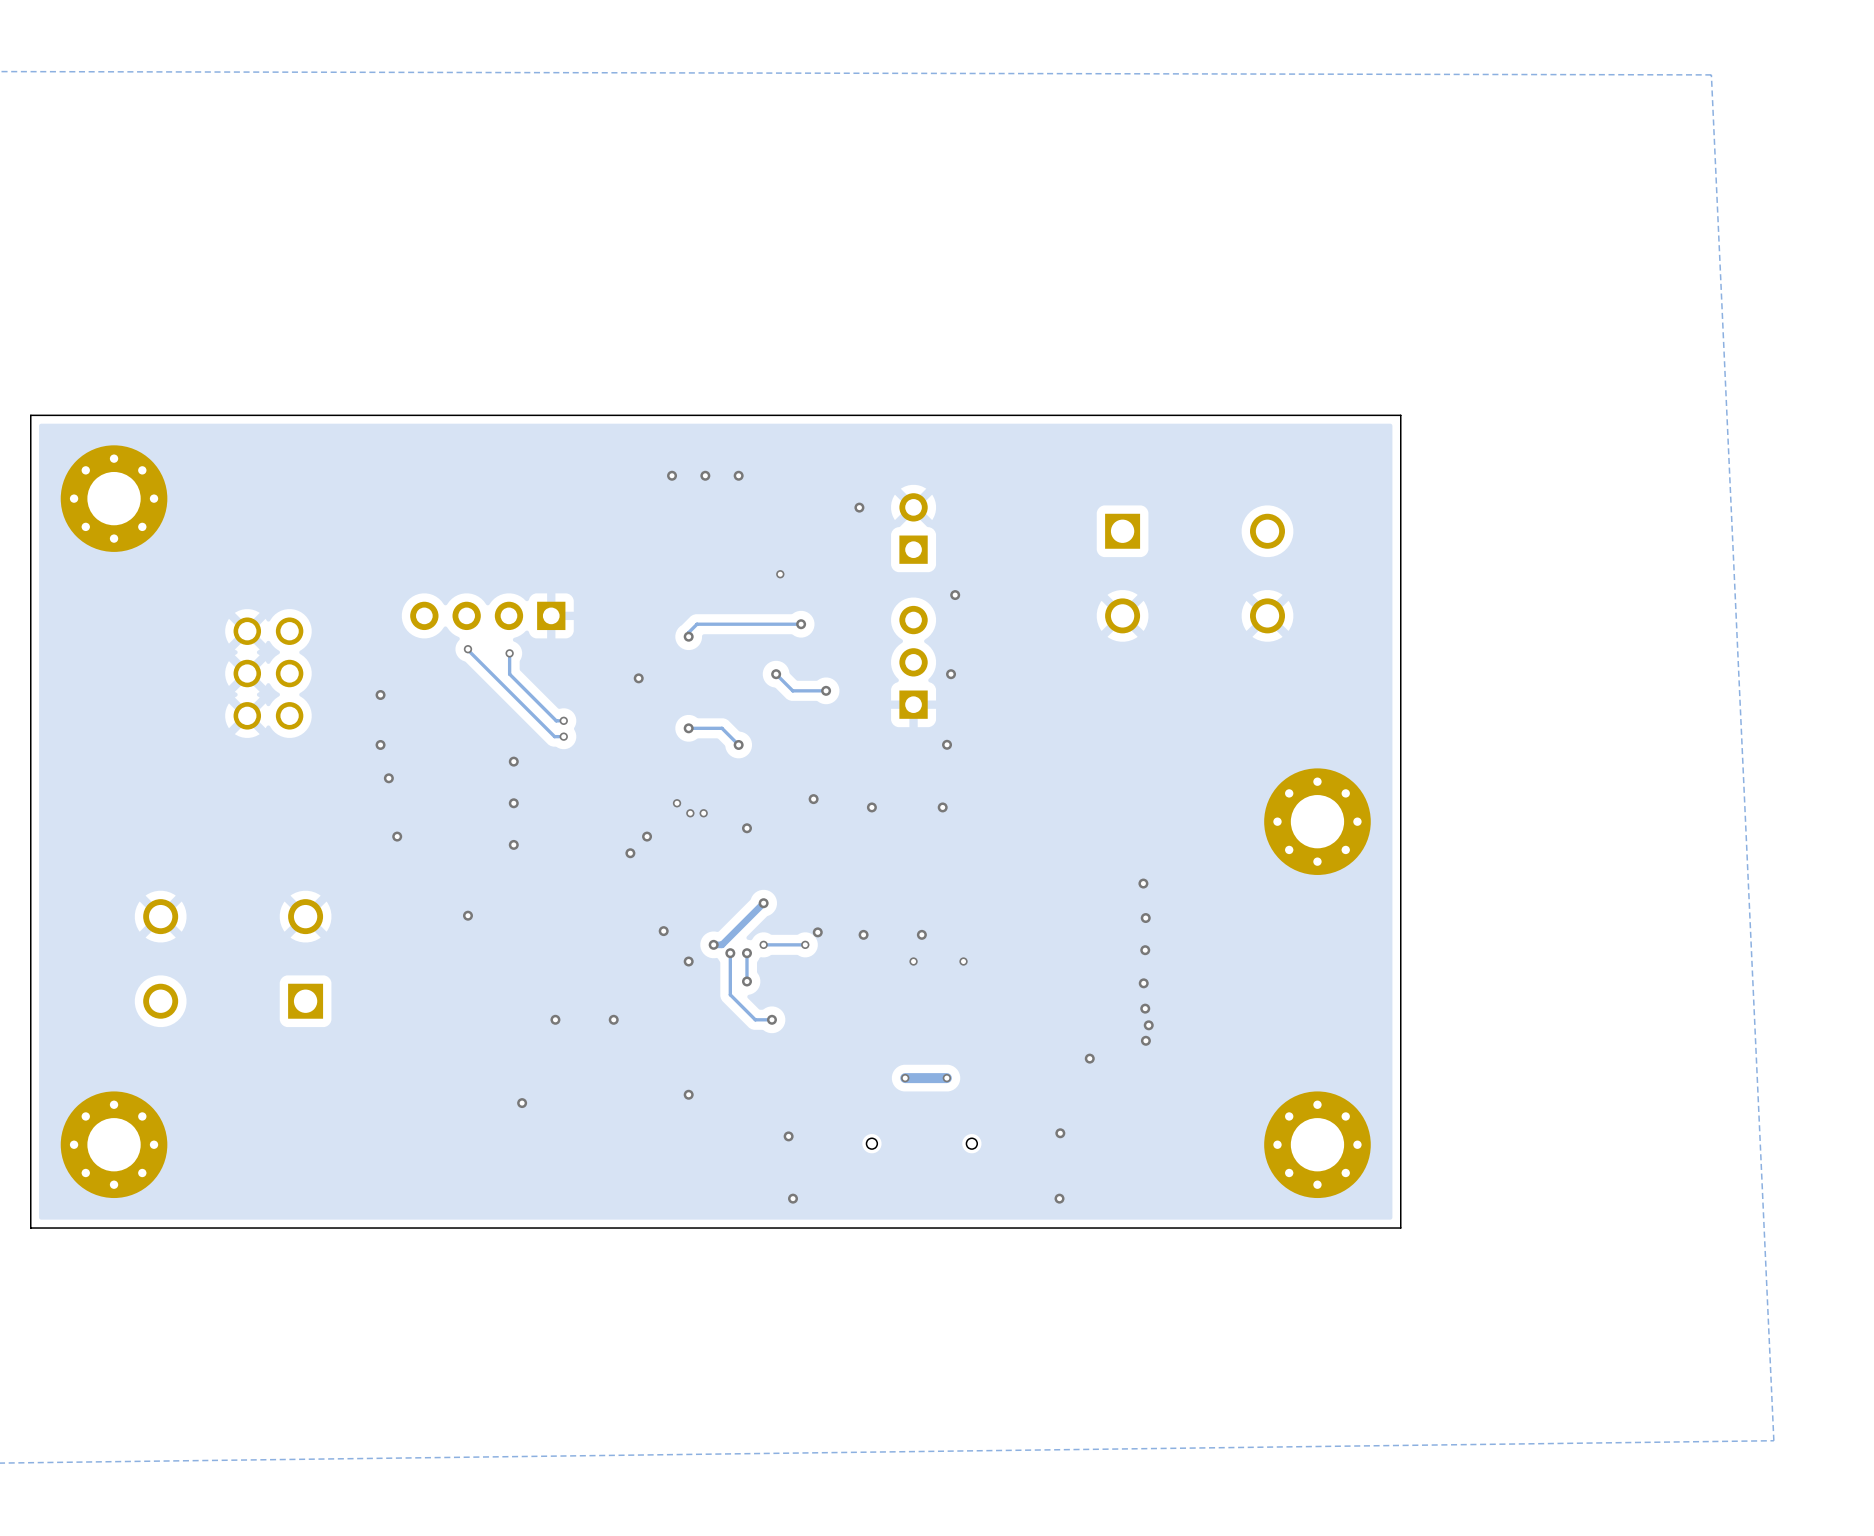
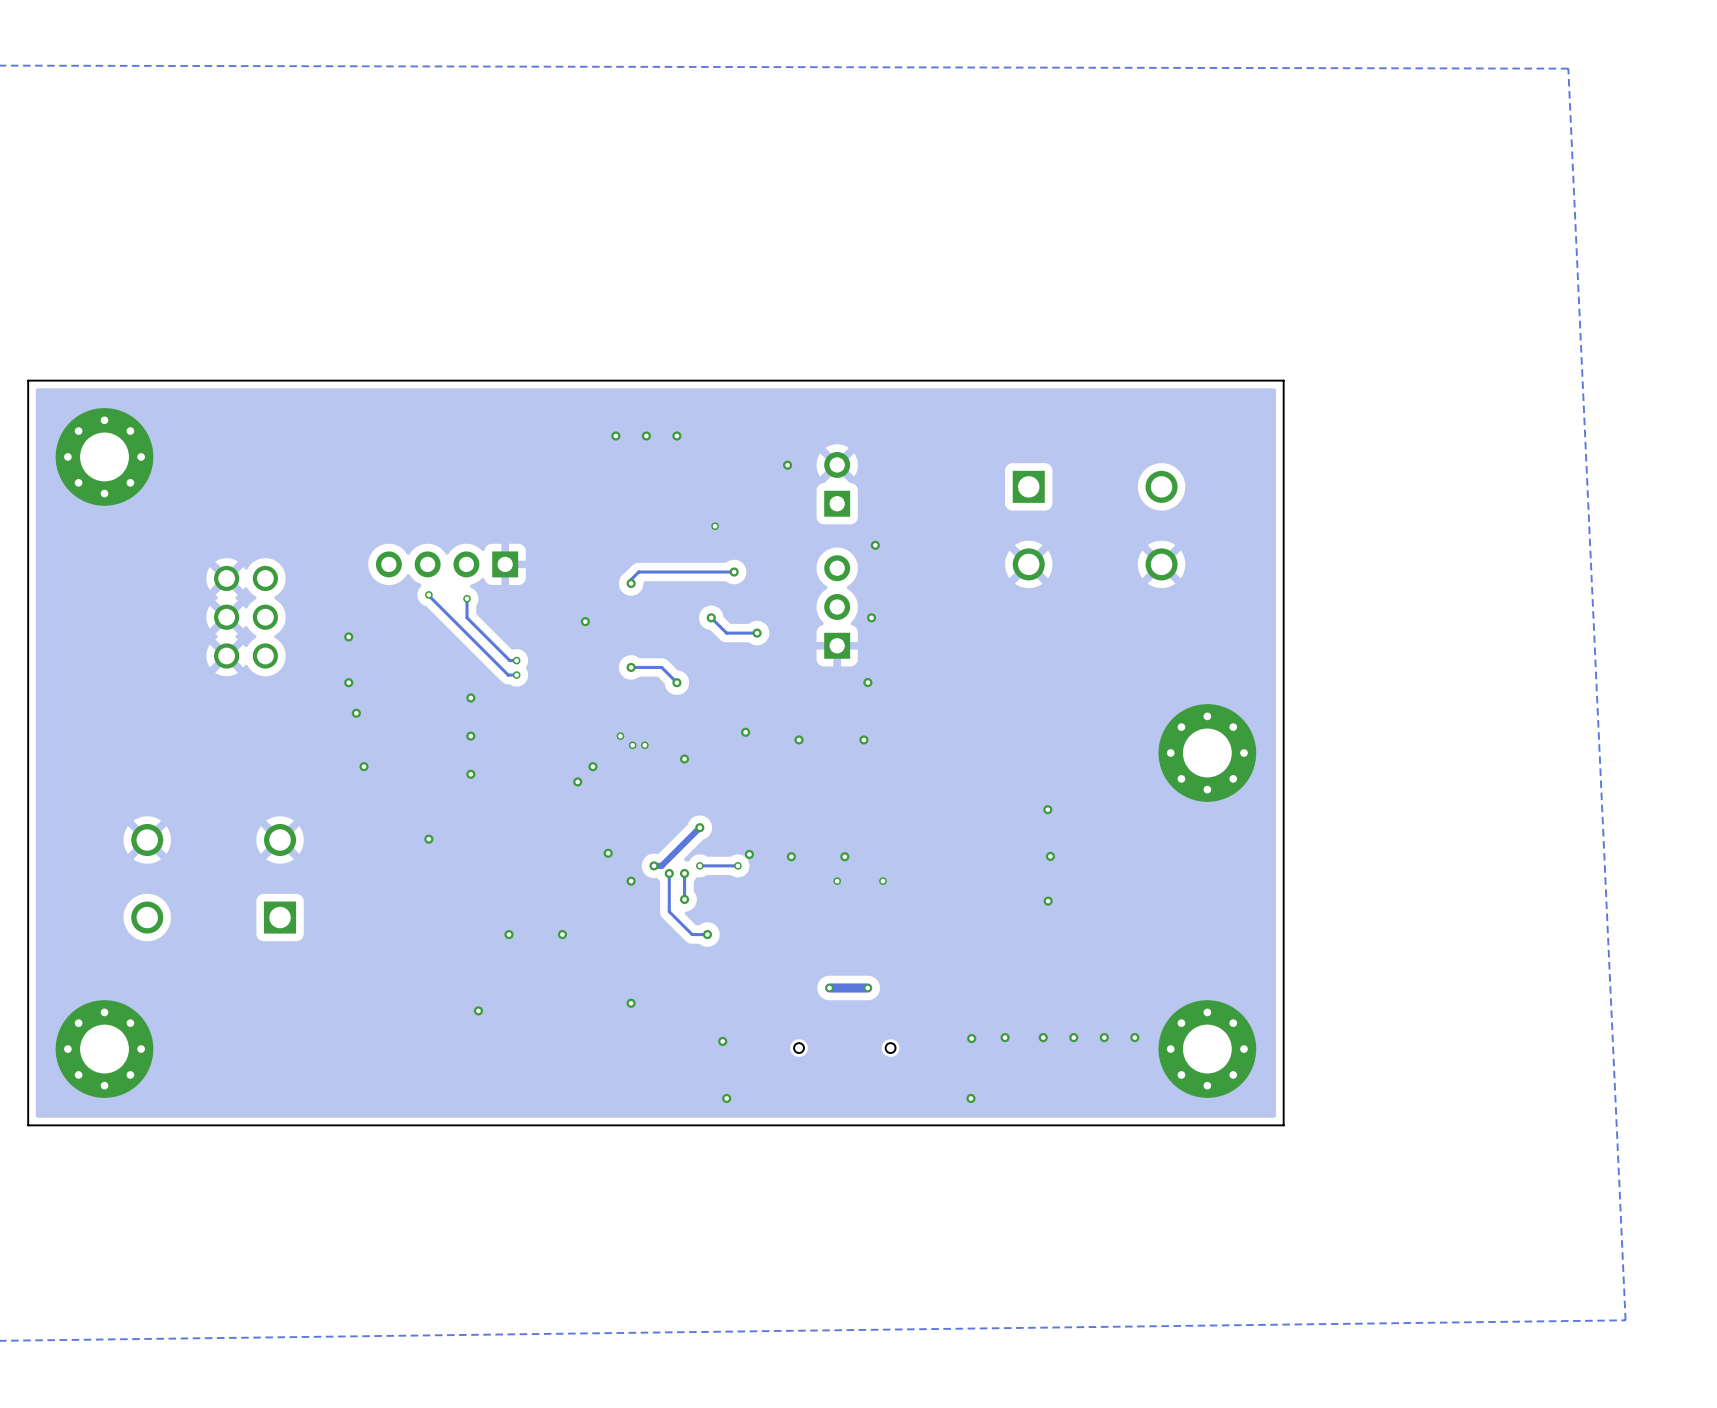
via: (1145, 918) -> none
via: none -> (1050, 856)
via: (1145, 950) -> none
via: (1145, 1008) -> none
via: (1148, 1025) -> none
via: (1145, 1040) -> none
via: (1089, 1058) -> none
via: none -> (1005, 1037)
via: none -> (1043, 1037)
via: none -> (1073, 1037)
via: none -> (1104, 1037)
via: none -> (1134, 1037)

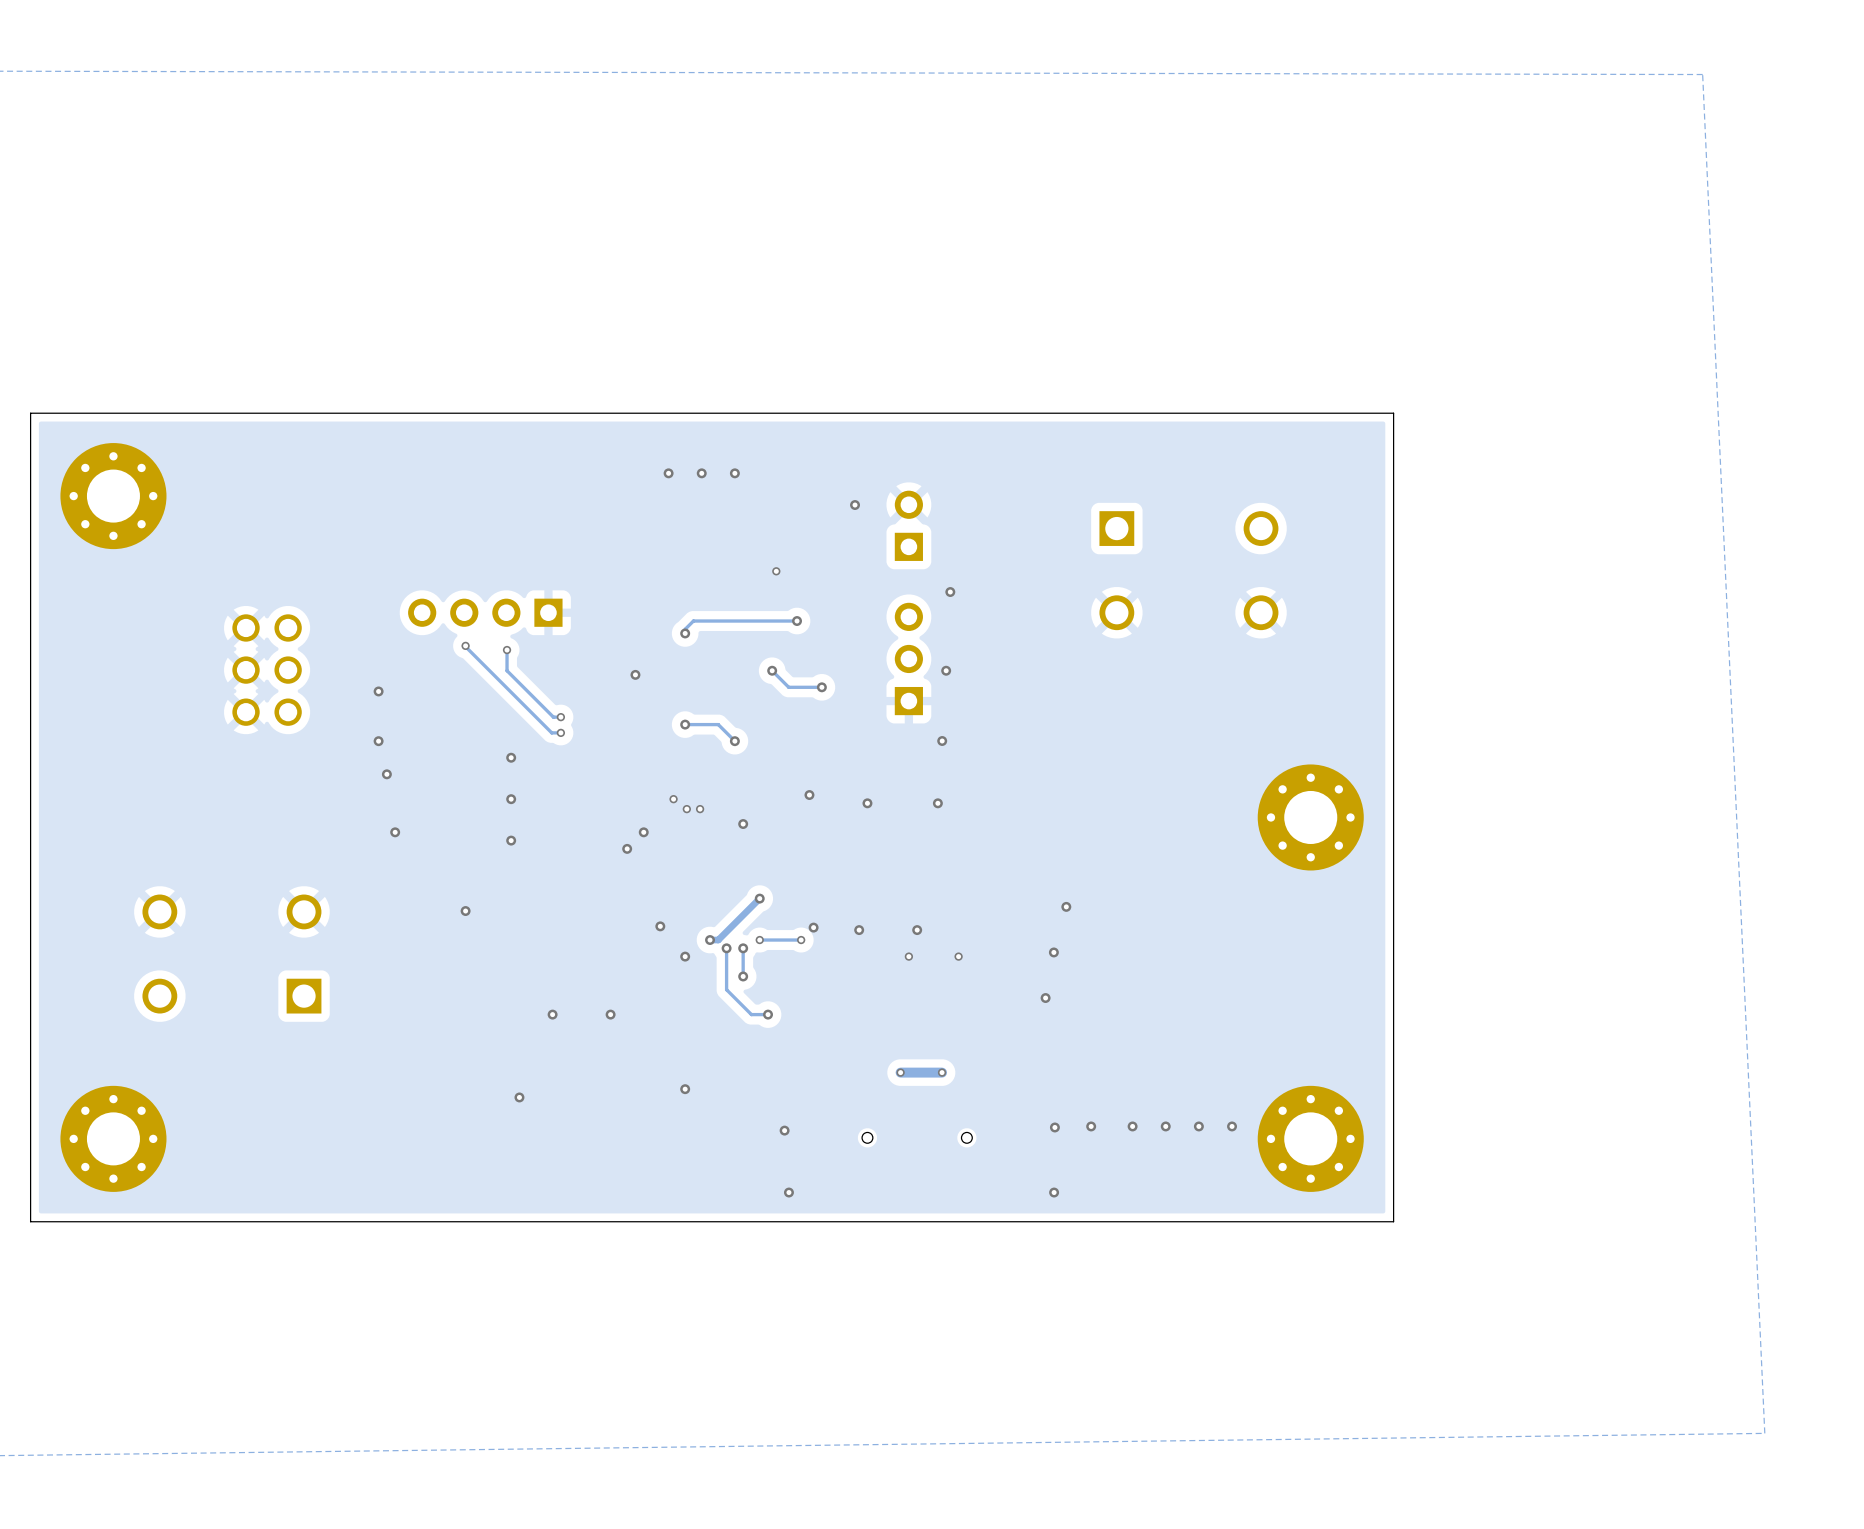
via: (1047, 809) -> none
via: none -> (1066, 906)
via: (1050, 856) -> none
via: none -> (1053, 952)
via: (1048, 901) -> none
via: none -> (1045, 998)

